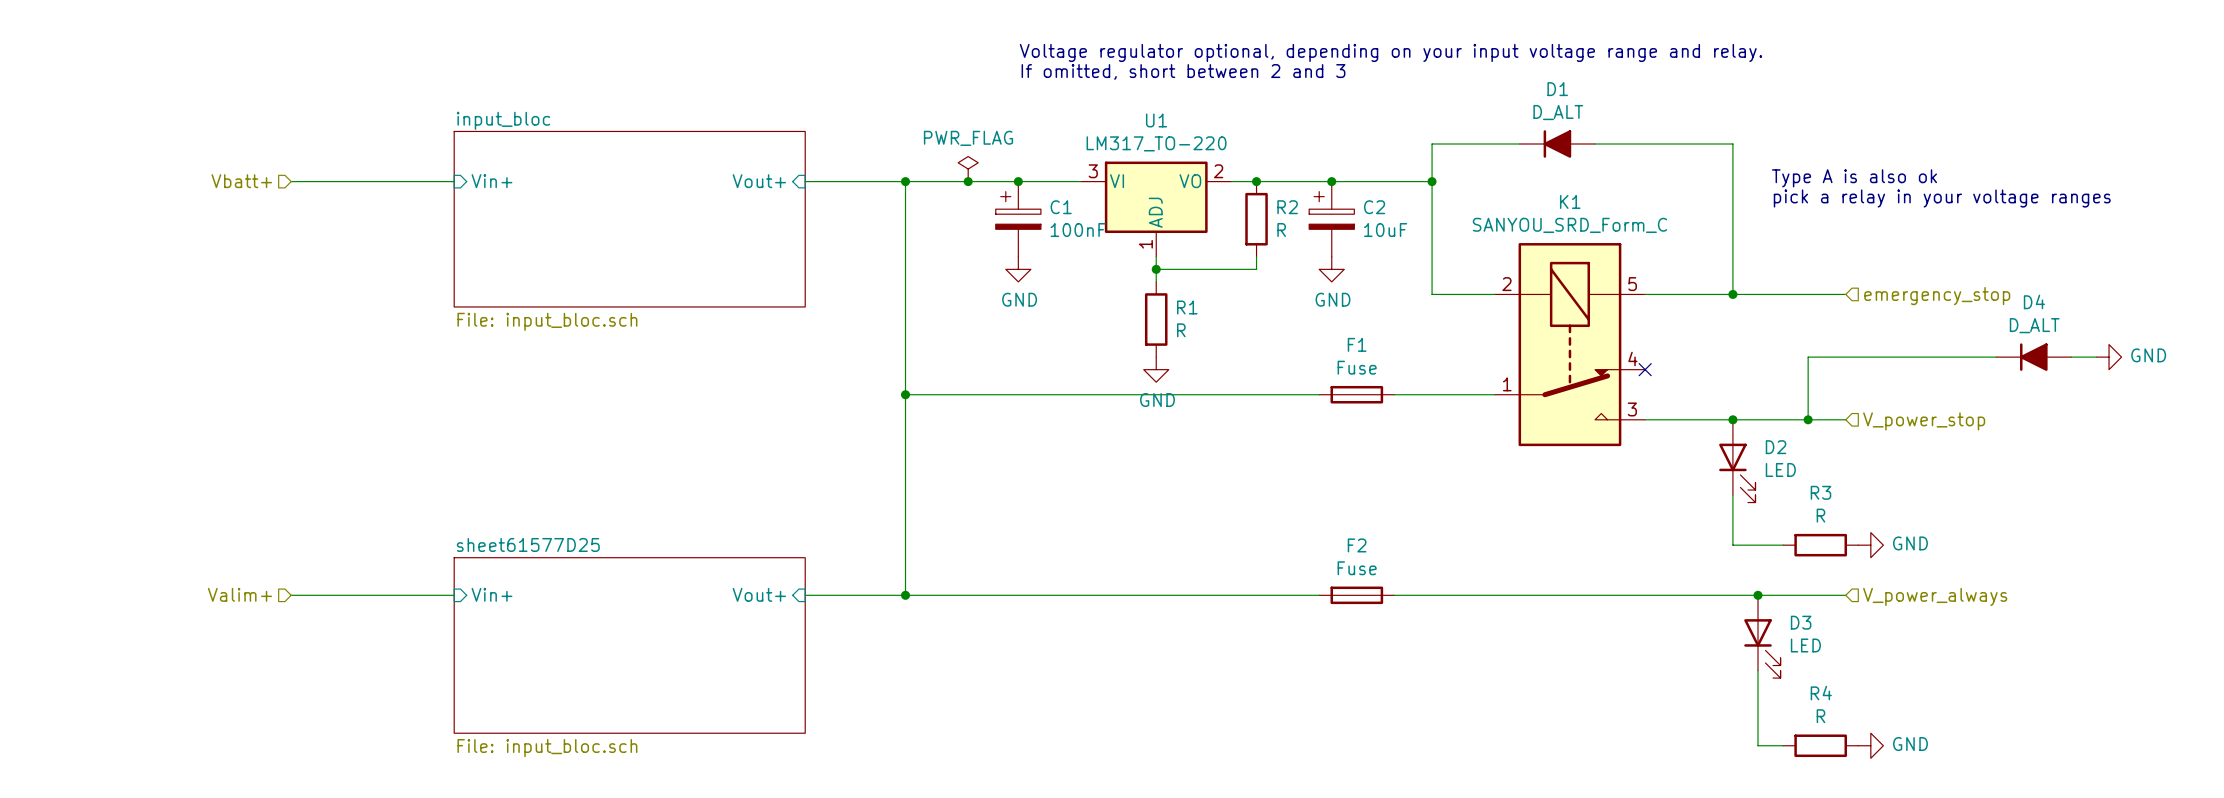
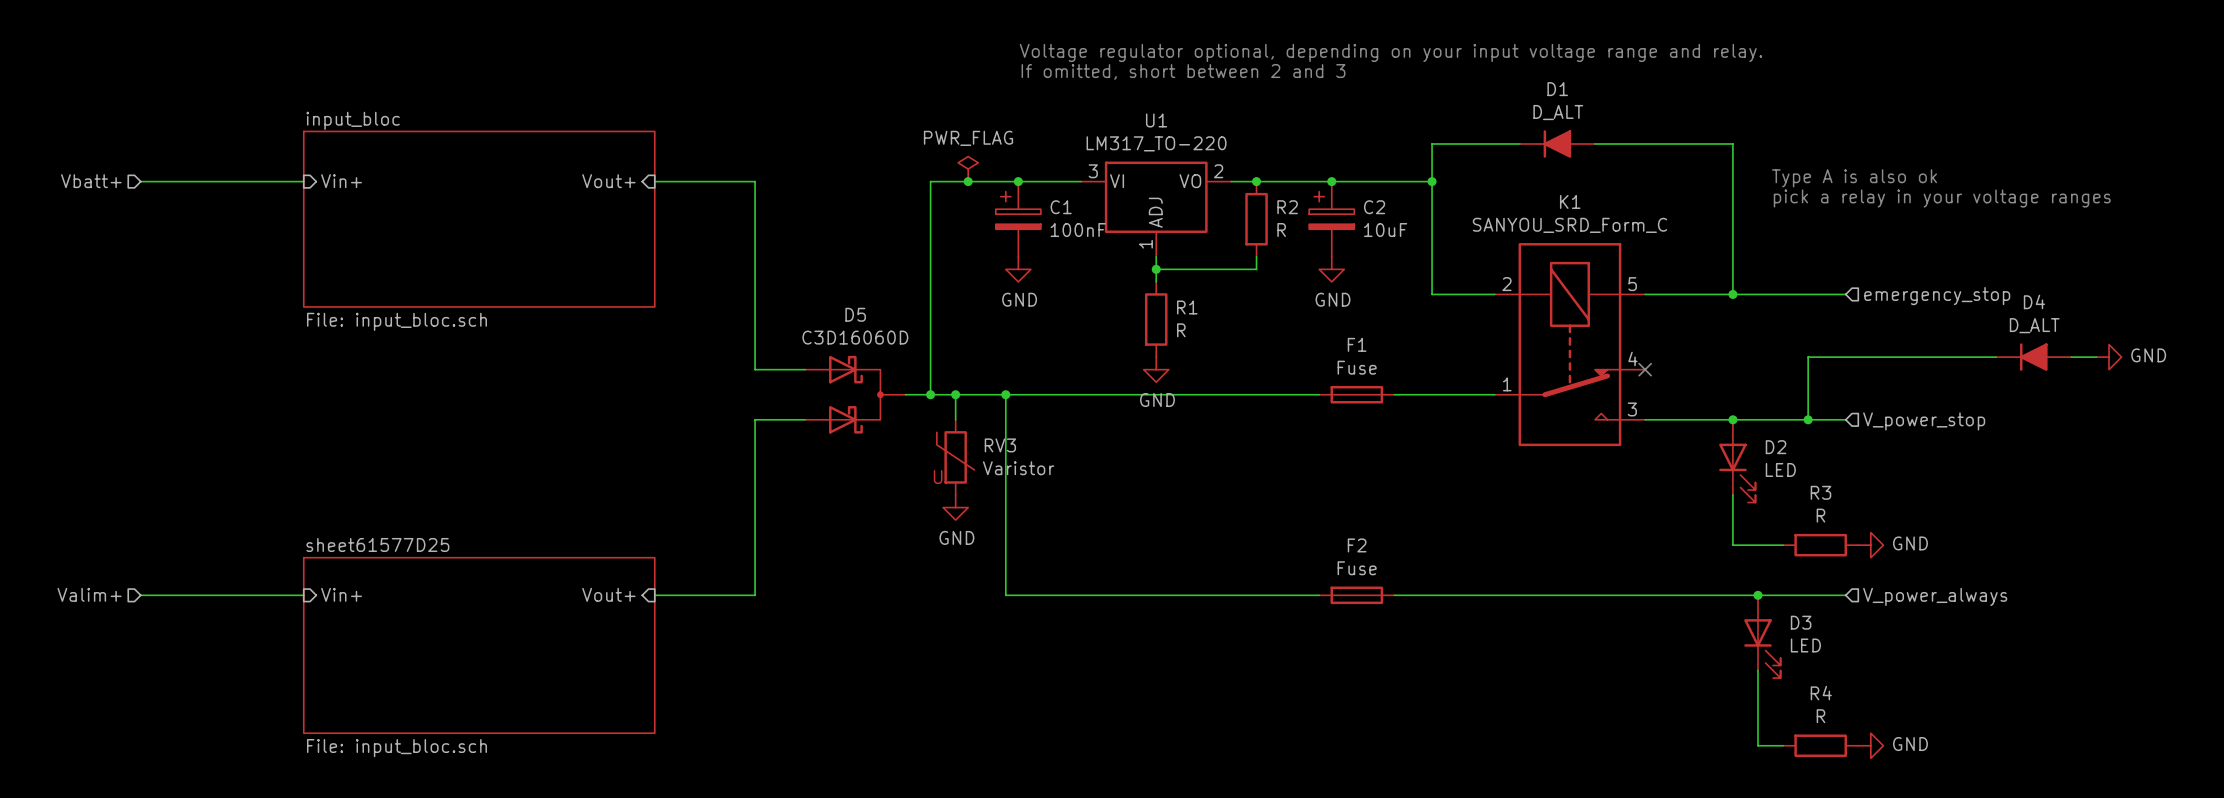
hierarchical label position: Vbatt+ (241, 181) -> Vbatt+ (91, 181)
wire: (303, 181) (454, 181) -> (140, 181) (291, 181)
sheet pin position: Vin+ (492, 181) -> Vin+ (341, 181)
wire: none -> (654, 181) (755, 181) (755, 369) (805, 369)
sheet pin position: Vout+ (759, 181) -> Vout+ (608, 181)
wire: (805, 181) (930, 181) -> (930, 394) (930, 181)
wire: (905, 181) (905, 595) -> none
junction: (905, 181) -> none
sheet input_bloc position: (629, 219) -> (479, 219)
D5: none -> C3D16060D (855, 394)
junction: (905, 394) -> none
junction: none -> (930, 394)
wire: none -> (955, 394) (955, 419)
junction: none -> (955, 394)
junction: none -> (1005, 394)
wire: none -> (805, 419) (755, 419) (755, 595) (654, 595)
RV3: none -> Varistor (955, 457)
power symbol: none -> GND (955, 507)
hierarchical label position: Valim+ (239, 594) -> Valim+ (89, 594)
sheet pin position: Vin+ (492, 594) -> Vin+ (341, 594)
sheet pin position: Vout+ (759, 594) -> Vout+ (608, 594)
wire: (303, 595) (454, 595) -> (140, 595) (291, 595)
wire: (805, 595) (1005, 595) -> (1005, 394) (1005, 595)
junction: (905, 595) -> none
sheet sheet61577D25 position: (629, 645) -> (479, 645)

